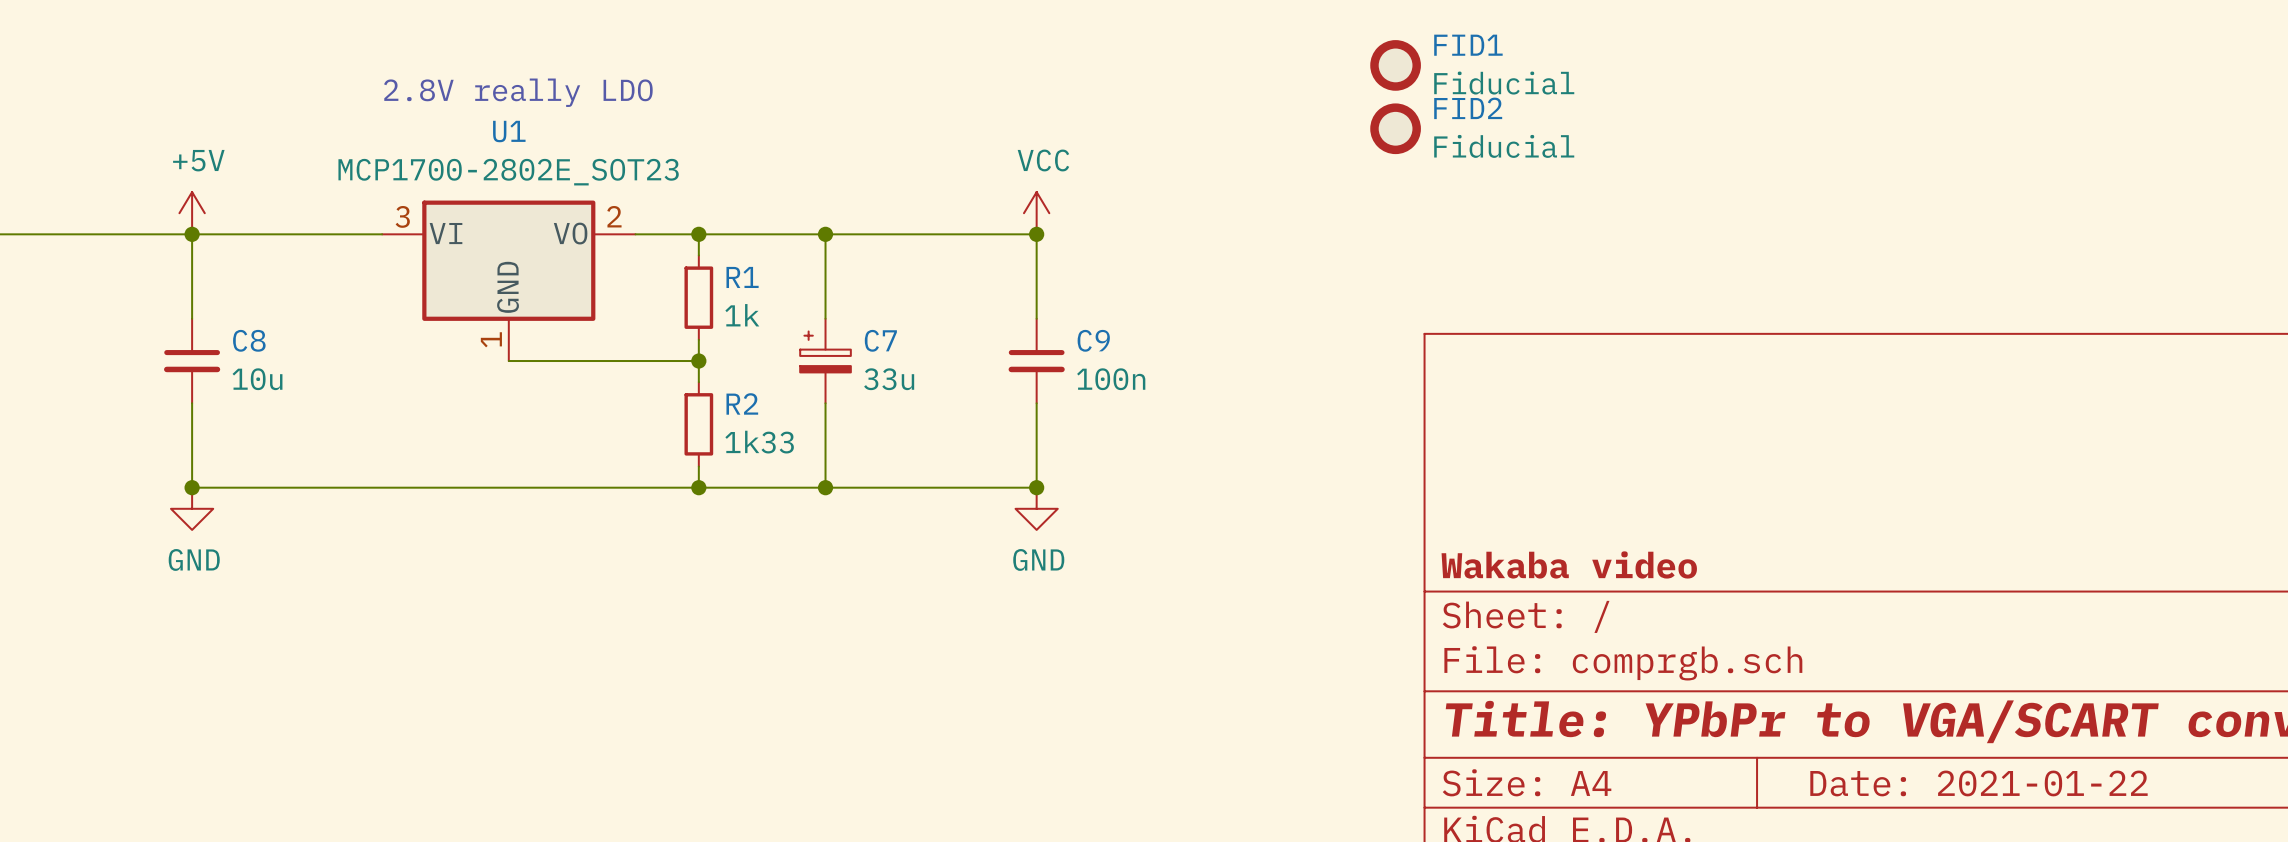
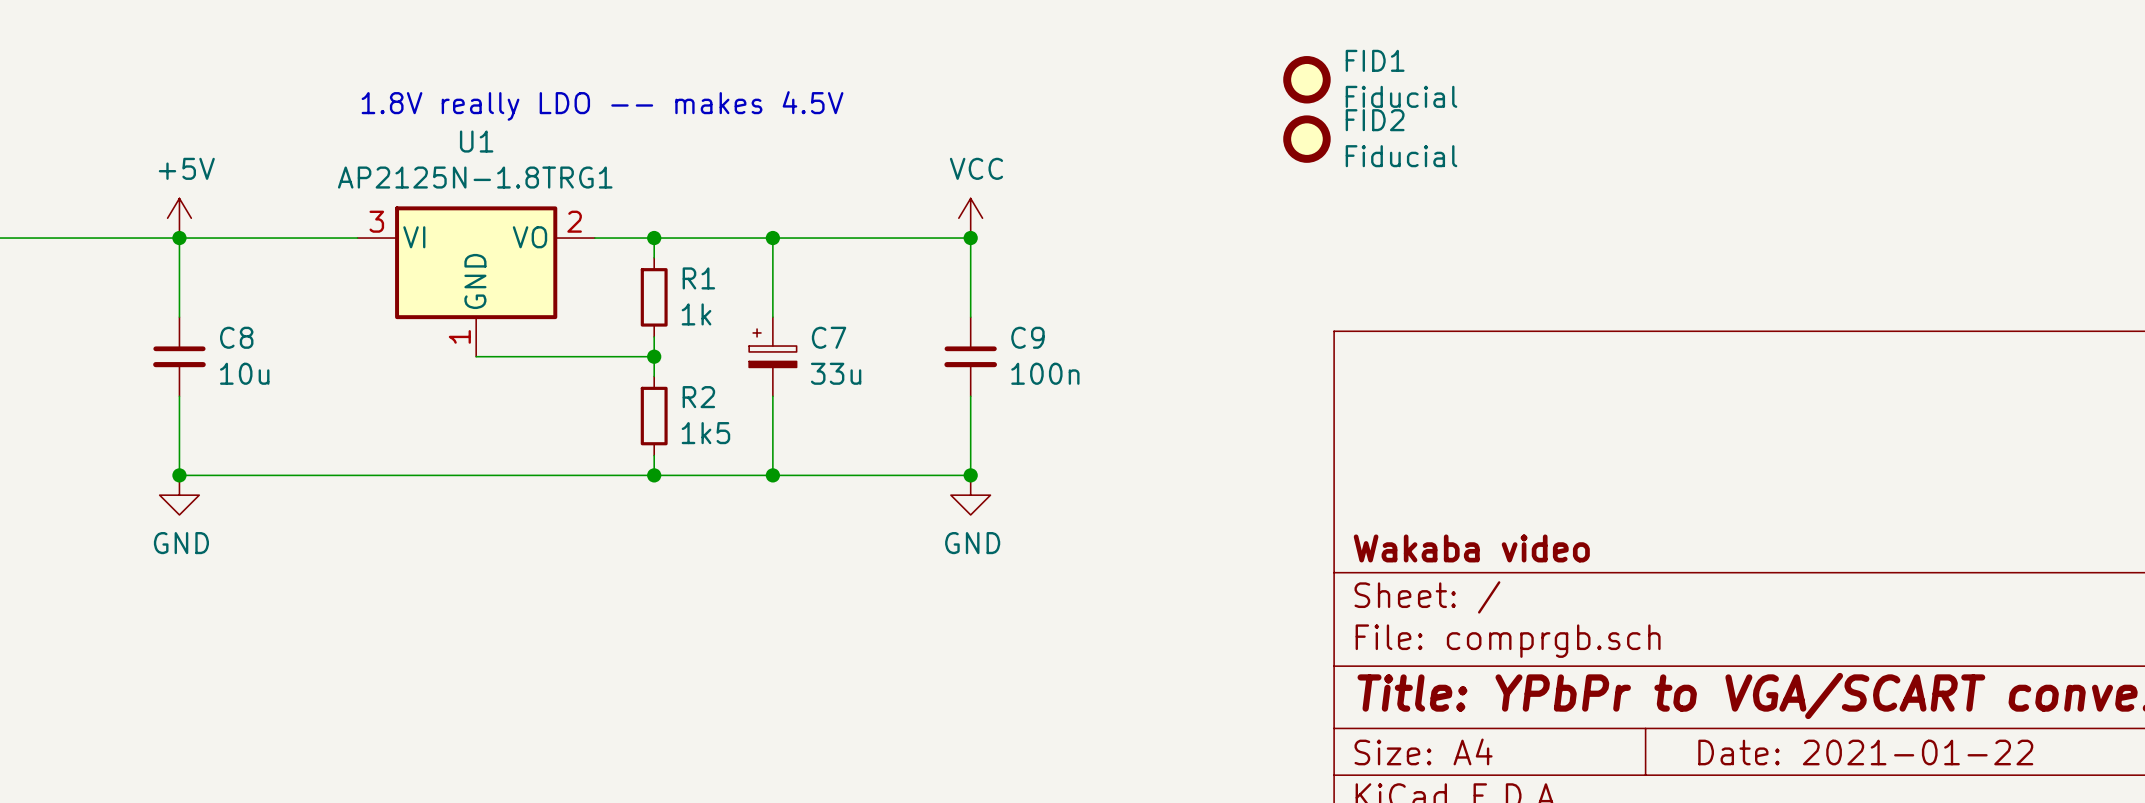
text: 2.8V really LDO (518, 92) -> 1.8V really LDO -- makes 4.5V (602, 105)
U1 value: MCP1700-2802E_SOT23 (508, 172) -> AP2125N-1.8TRG1 (475, 177)
R2 value: 1k33 (759, 442) -> 1k5 (705, 433)

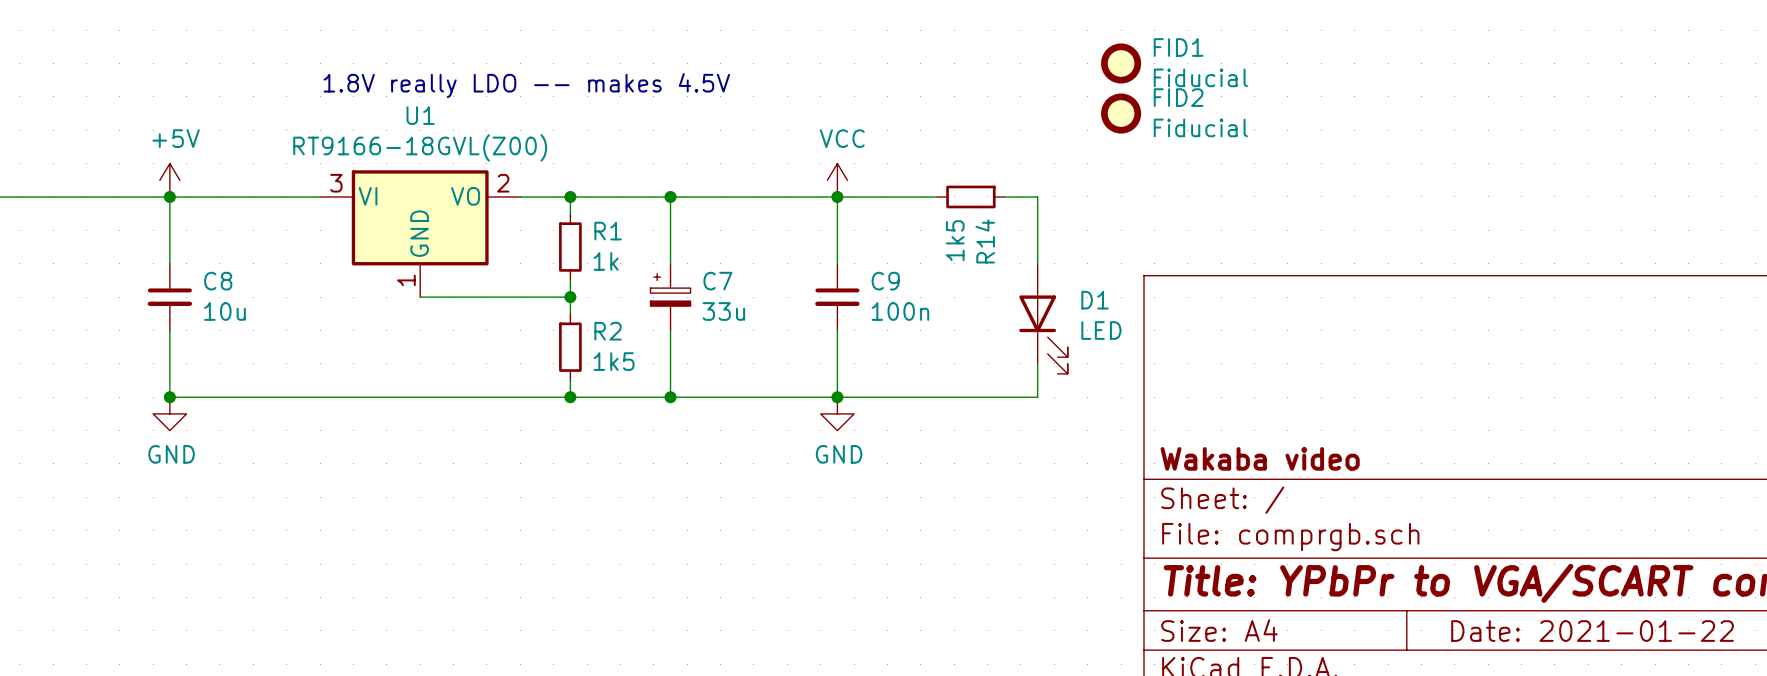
U1 value: AP2125N-1.8TRG1 (475, 177) -> RT9166-18GVL(Z00) (420, 147)
wire: none -> (837, 196) (937, 196)
R14: none -> 1k5 (970, 196)
wire: none -> (1004, 196) (1037, 196) (1037, 263)
D1: none -> LED (1043, 318)
wire: none -> (1037, 363) (1037, 397) (837, 397)

